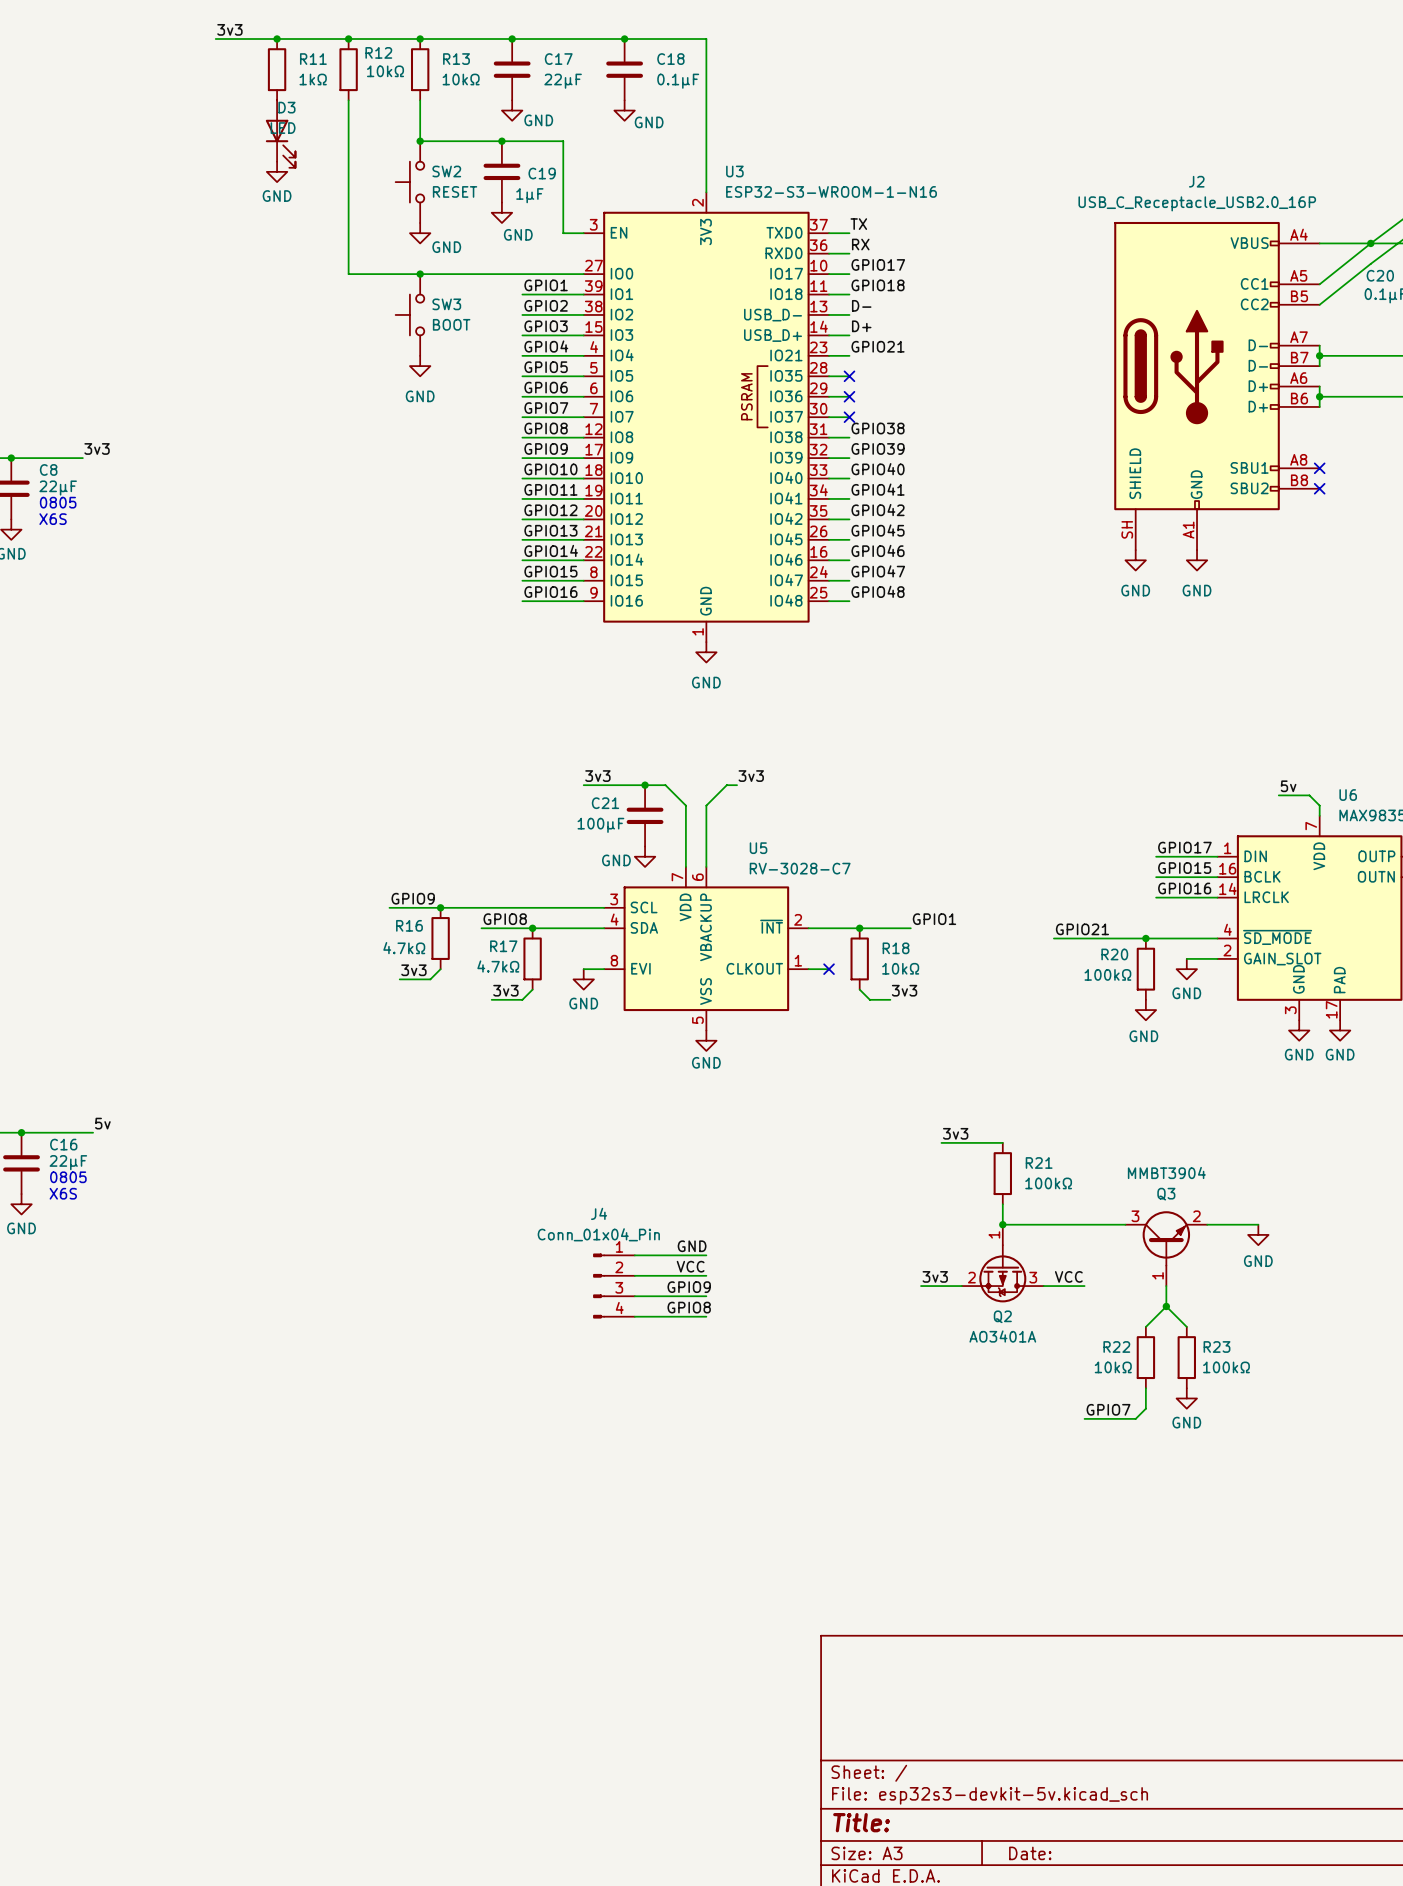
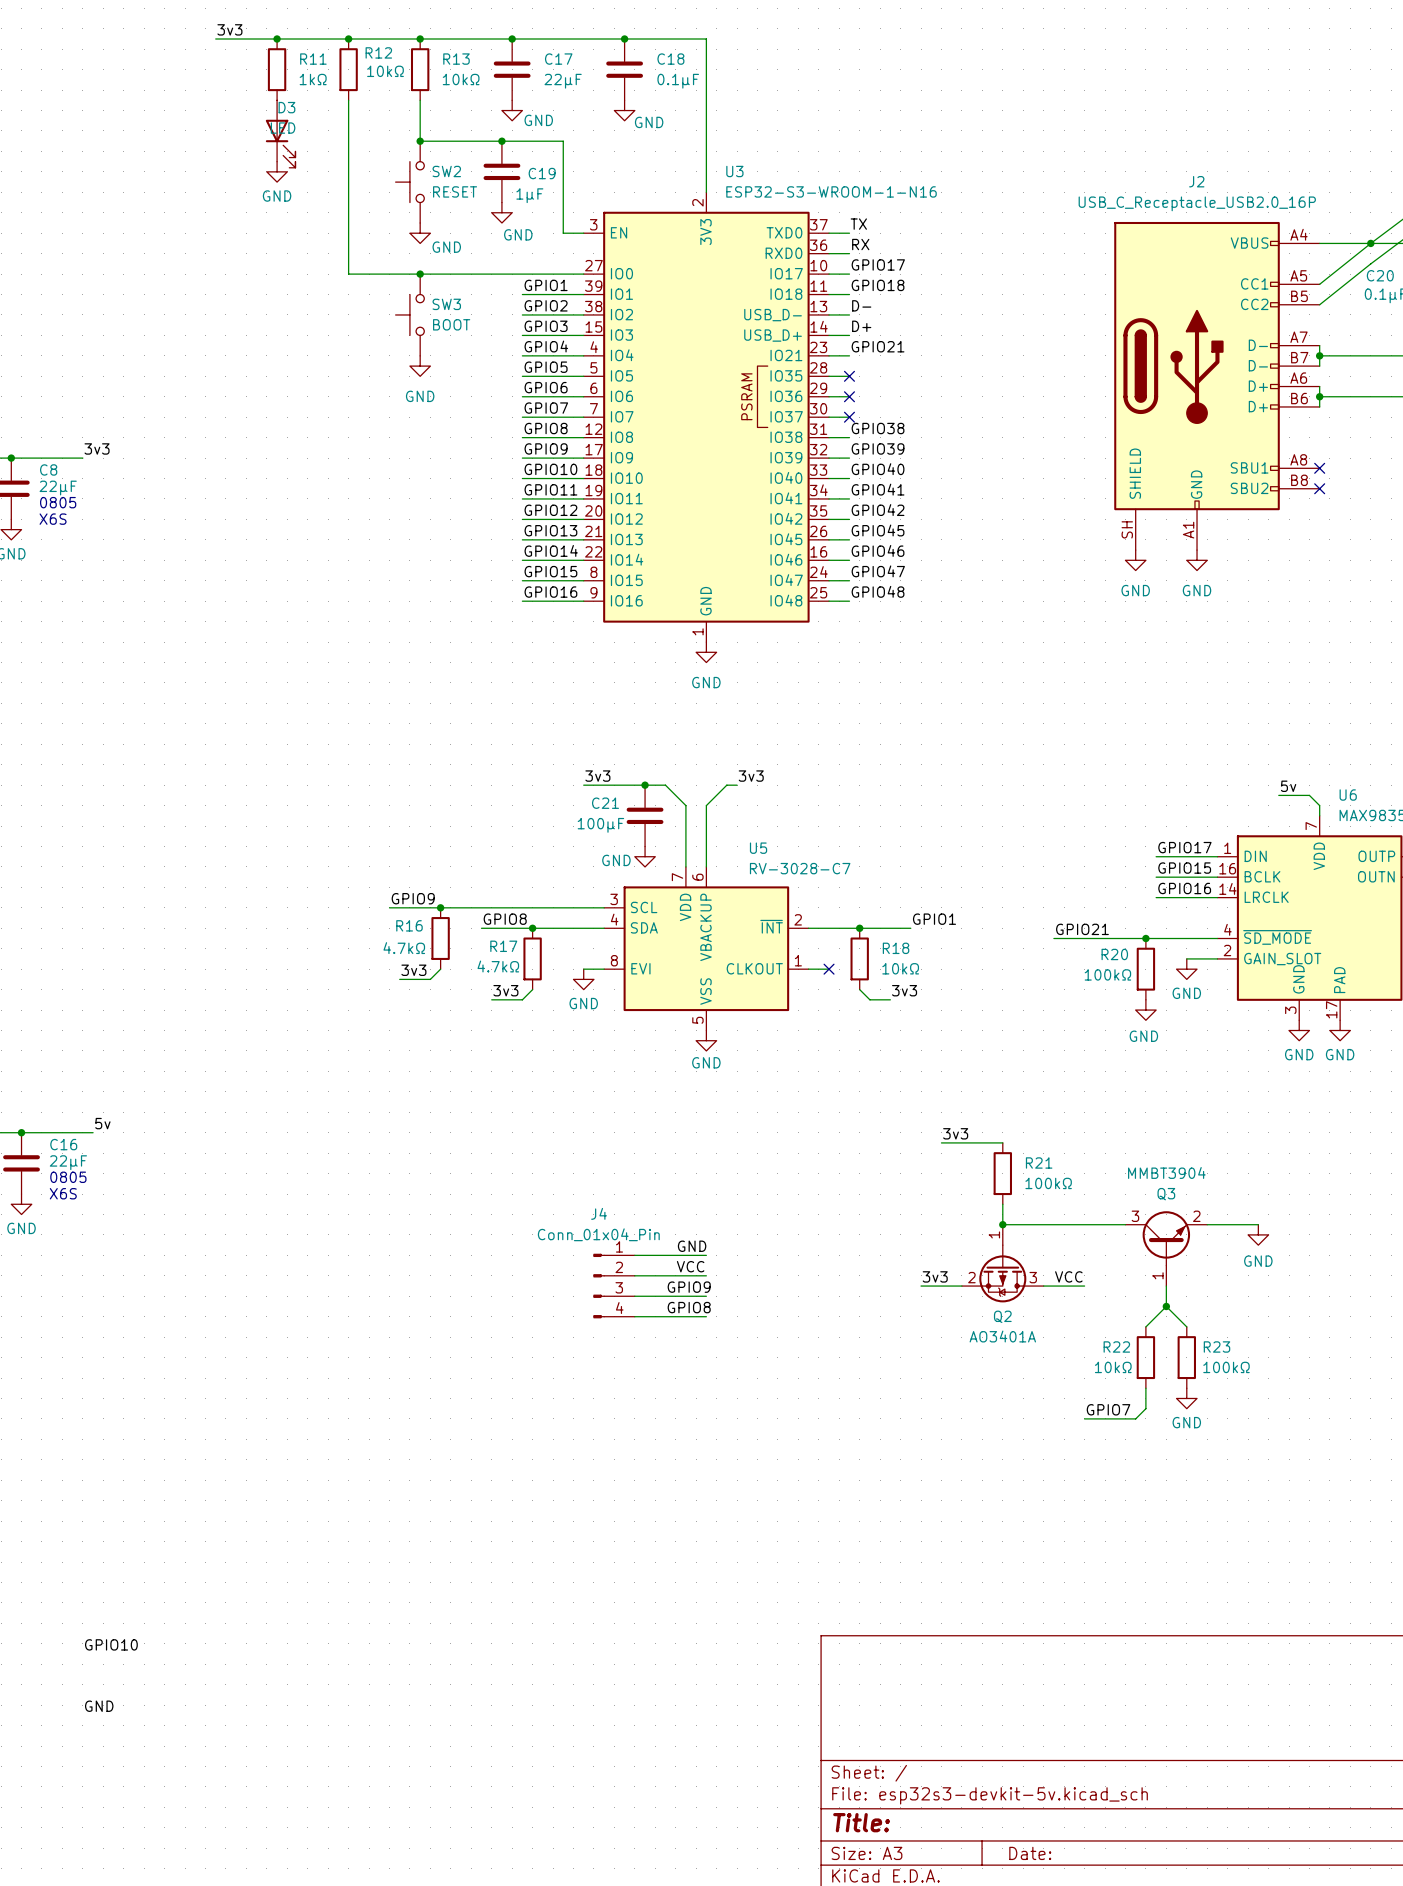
label: none -> GPIO10 (111, 1644)
label: none -> GND (99, 1706)

